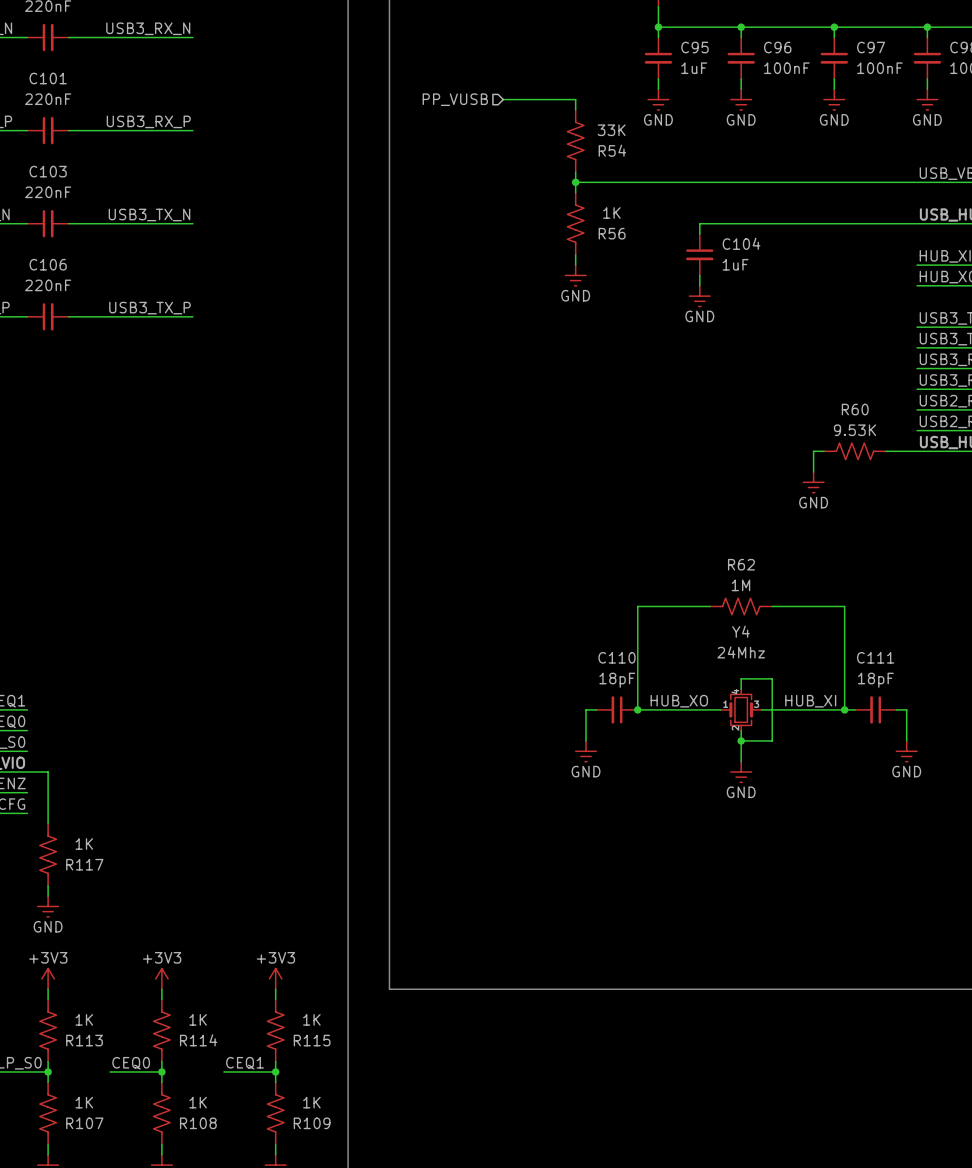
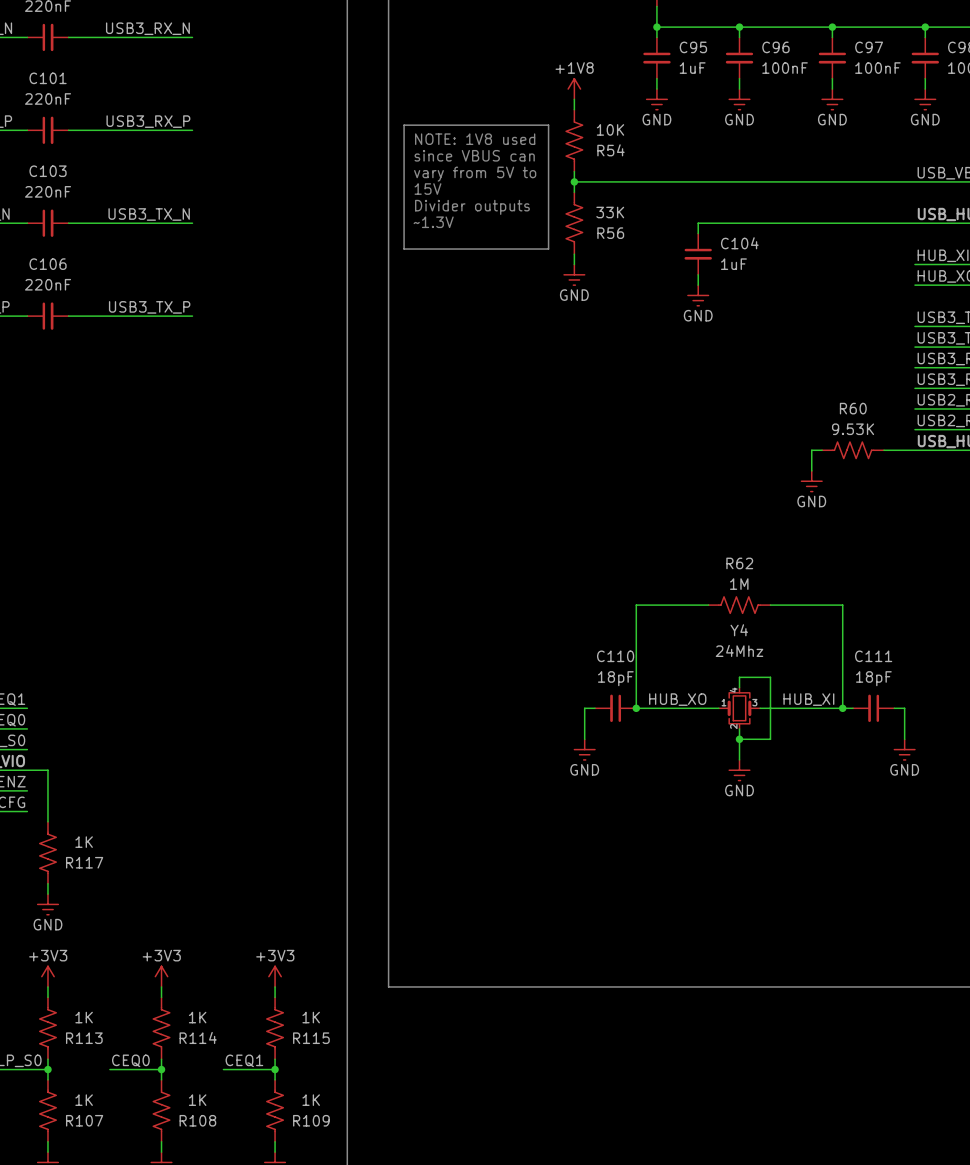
power symbol: none -> +1V8 (574, 89)
hierarchical label: PP_VUSB (455, 99) -> none
wire: (503, 99) (575, 99) -> none
line: none -> (404, 125) (548, 125) (548, 249) (404, 249) (404, 125)
R54 value: 33K (611, 130) -> 10K (610, 129)
text: none -> NOTE: 1V8 used (475, 139)
text: none -> since VBUS can (474, 155)
text: none -> vary from 5V to (475, 174)
text: none -> 15V (427, 189)
text: none -> Divider outputs (472, 207)
R56 value: 1K (611, 212) -> 33K (610, 212)
text: none -> ~1.3V (433, 222)

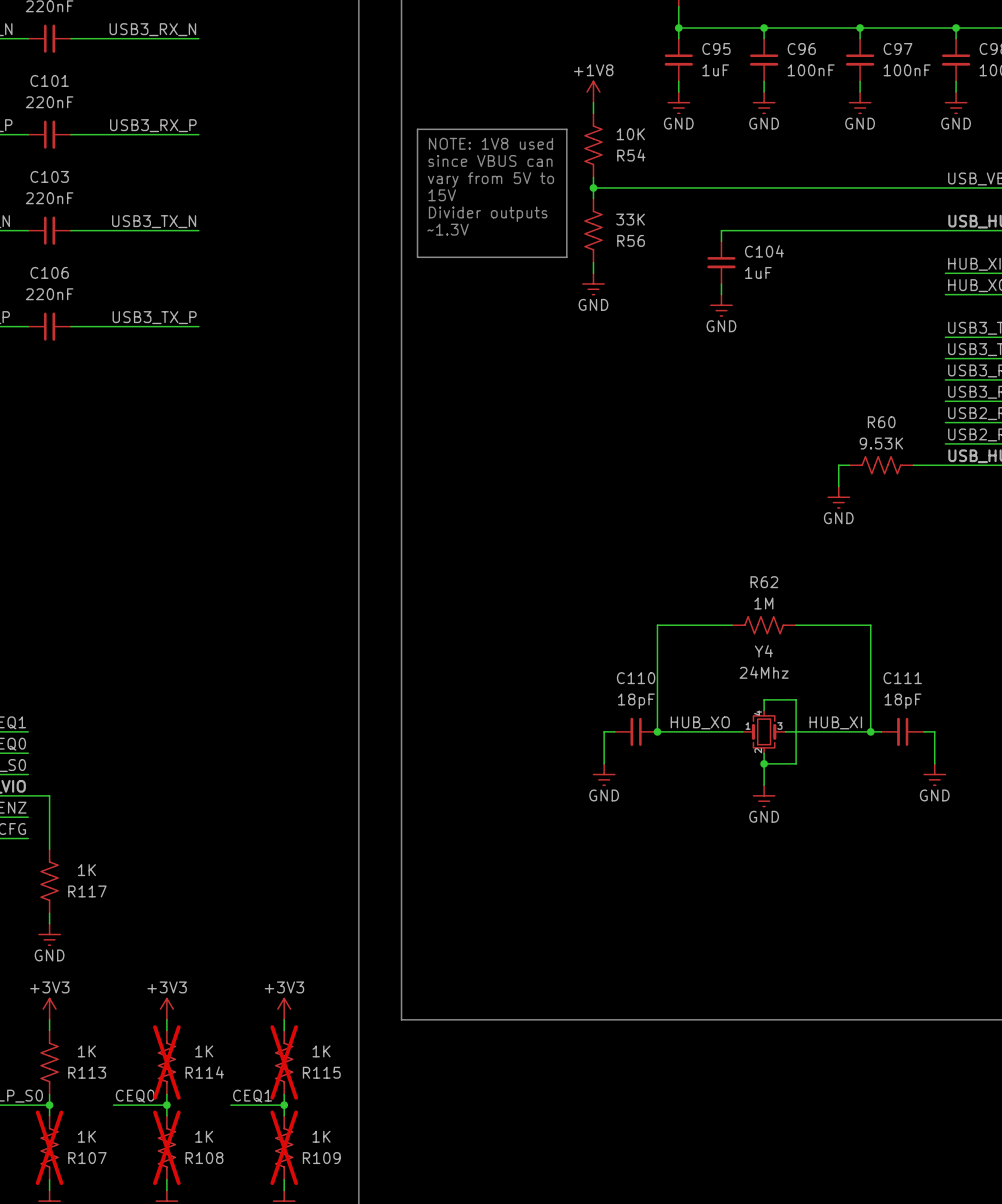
R114 do-not-place cross: none -> (166, 1062)
R115 do-not-place cross: none -> (284, 1062)
R107 do-not-place cross: none -> (49, 1147)
R108 do-not-place cross: none -> (166, 1147)
R109 do-not-place cross: none -> (284, 1147)

